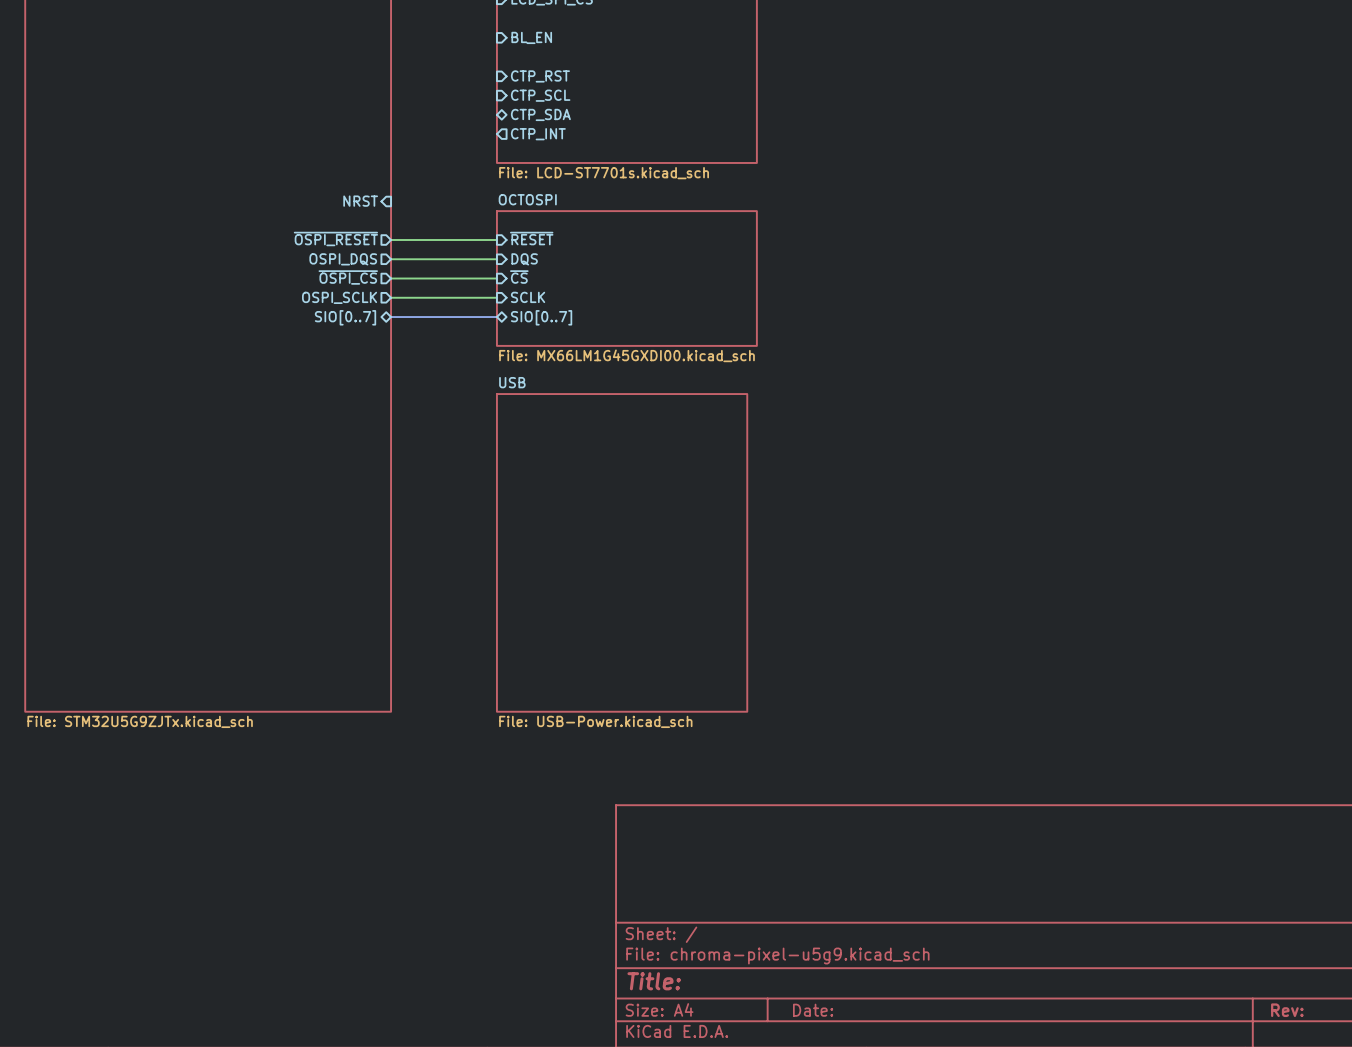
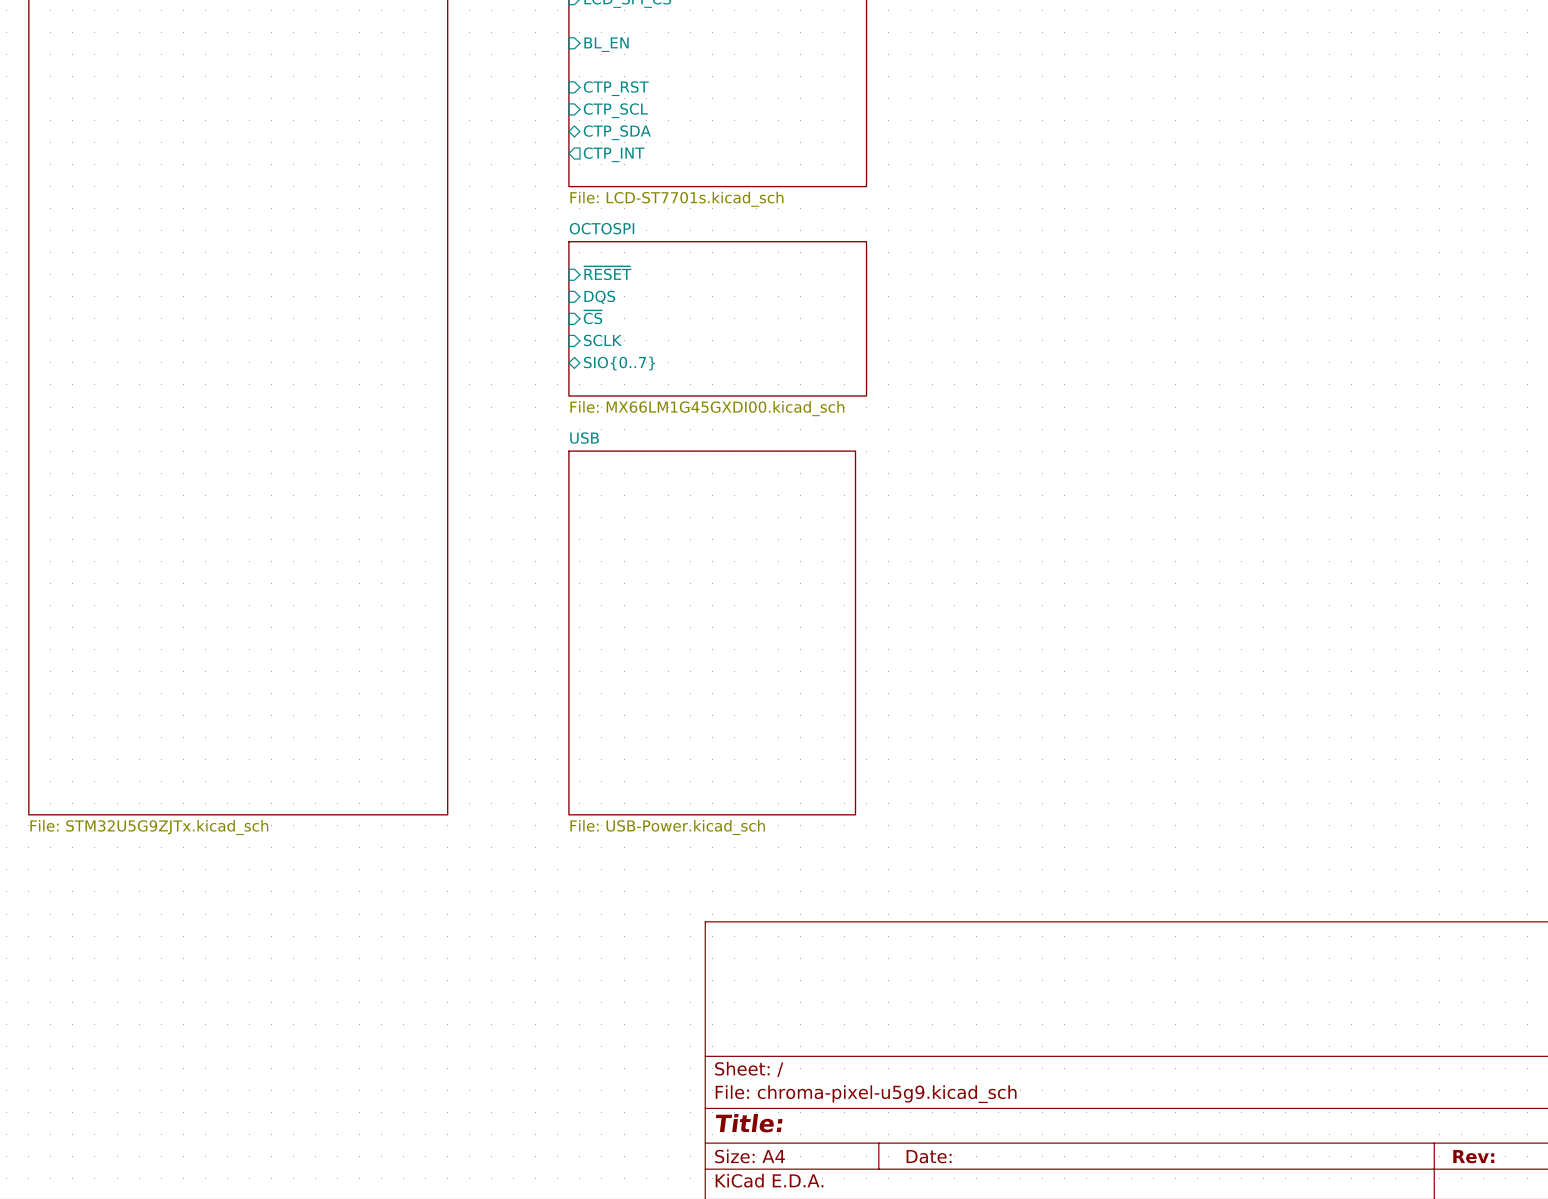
sheet pin: NRST (360, 201) -> none
sheet pin: ~{OSPI_RESET} (335, 238) -> none
wire: (391, 240) (496, 240) -> none
sheet pin: OSPI_DQS (343, 259) -> none
wire: (391, 259) (496, 259) -> none
sheet pin: ~{OSPI_CS} (348, 277) -> none
wire: (391, 278) (496, 278) -> none
sheet pin: OSPI_SCLK (339, 297) -> none
wire: (391, 297) (496, 297) -> none
sheet pin: SIO[0..7] (345, 317) -> none
bus: (391, 317) (496, 317) -> none
sheet pin: SIO[0..7] (541, 317) -> SIO{0..7} (619, 363)

